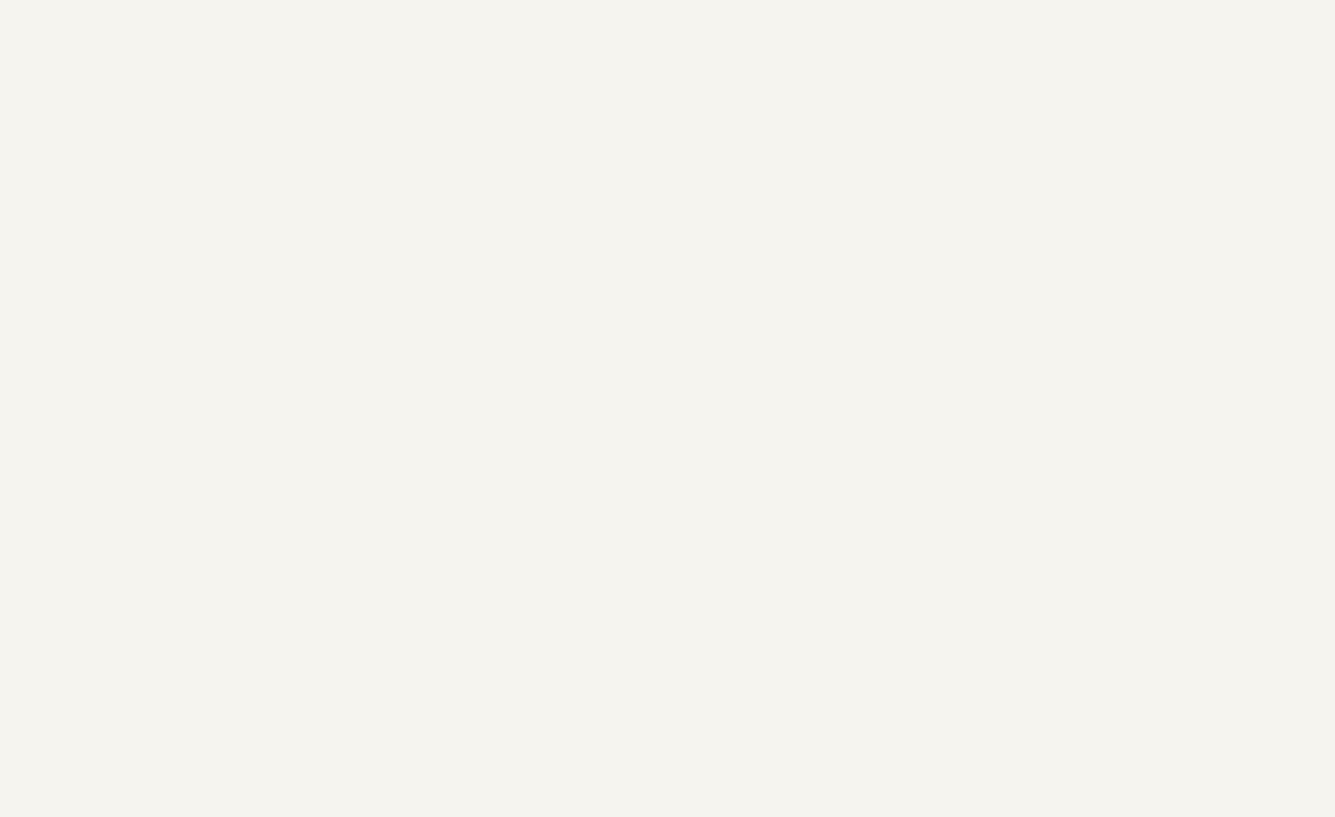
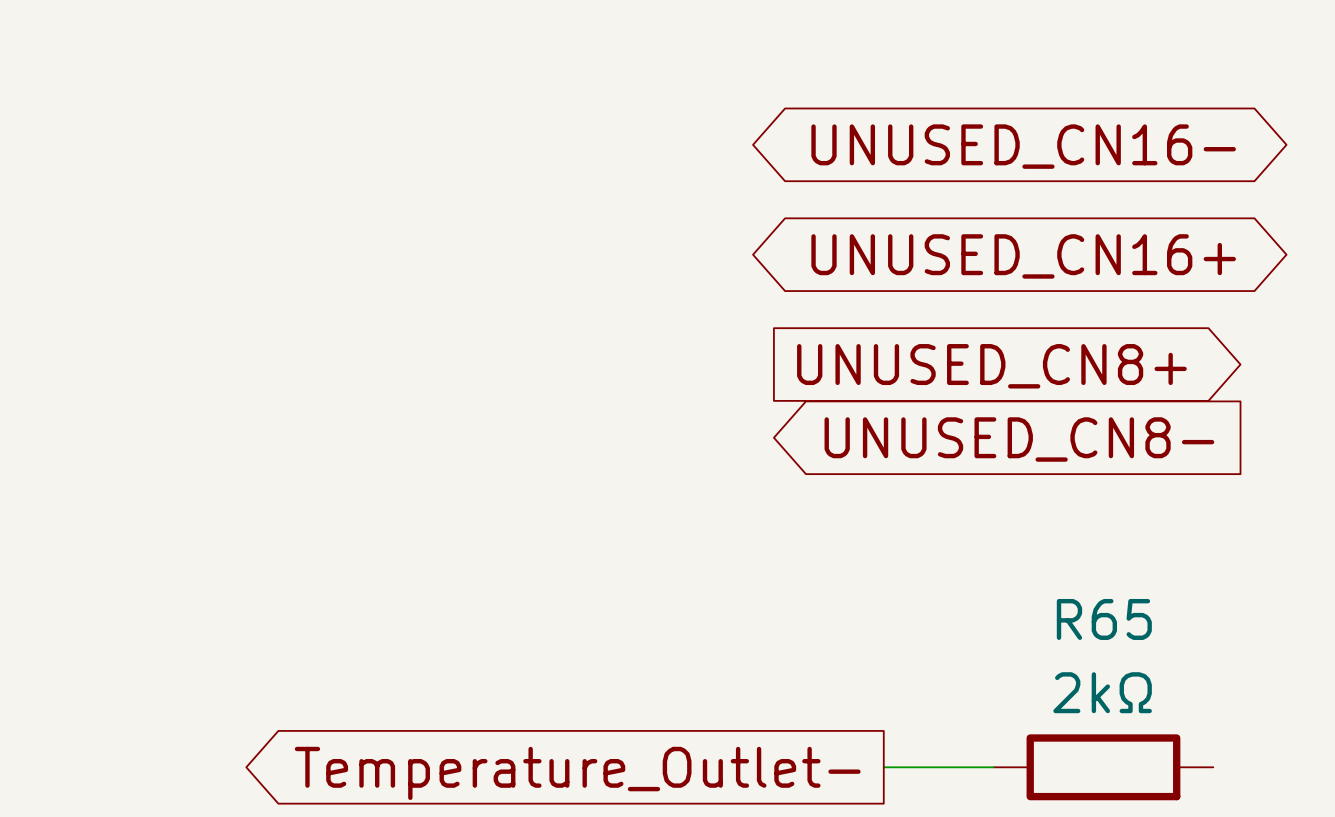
global label: none -> UNUSED_CN16- (1023, 146)
global label: none -> UNUSED_CN16+ (1023, 256)
global label: none -> UNUSED_CN8+ (991, 366)
global label: none -> UNUSED_CN8- (1019, 439)
wire: none -> (883, 767) (993, 767)
R65: none -> 2kΩ (1103, 767)
global label: none -> Temperature_Outlet- (577, 773)

